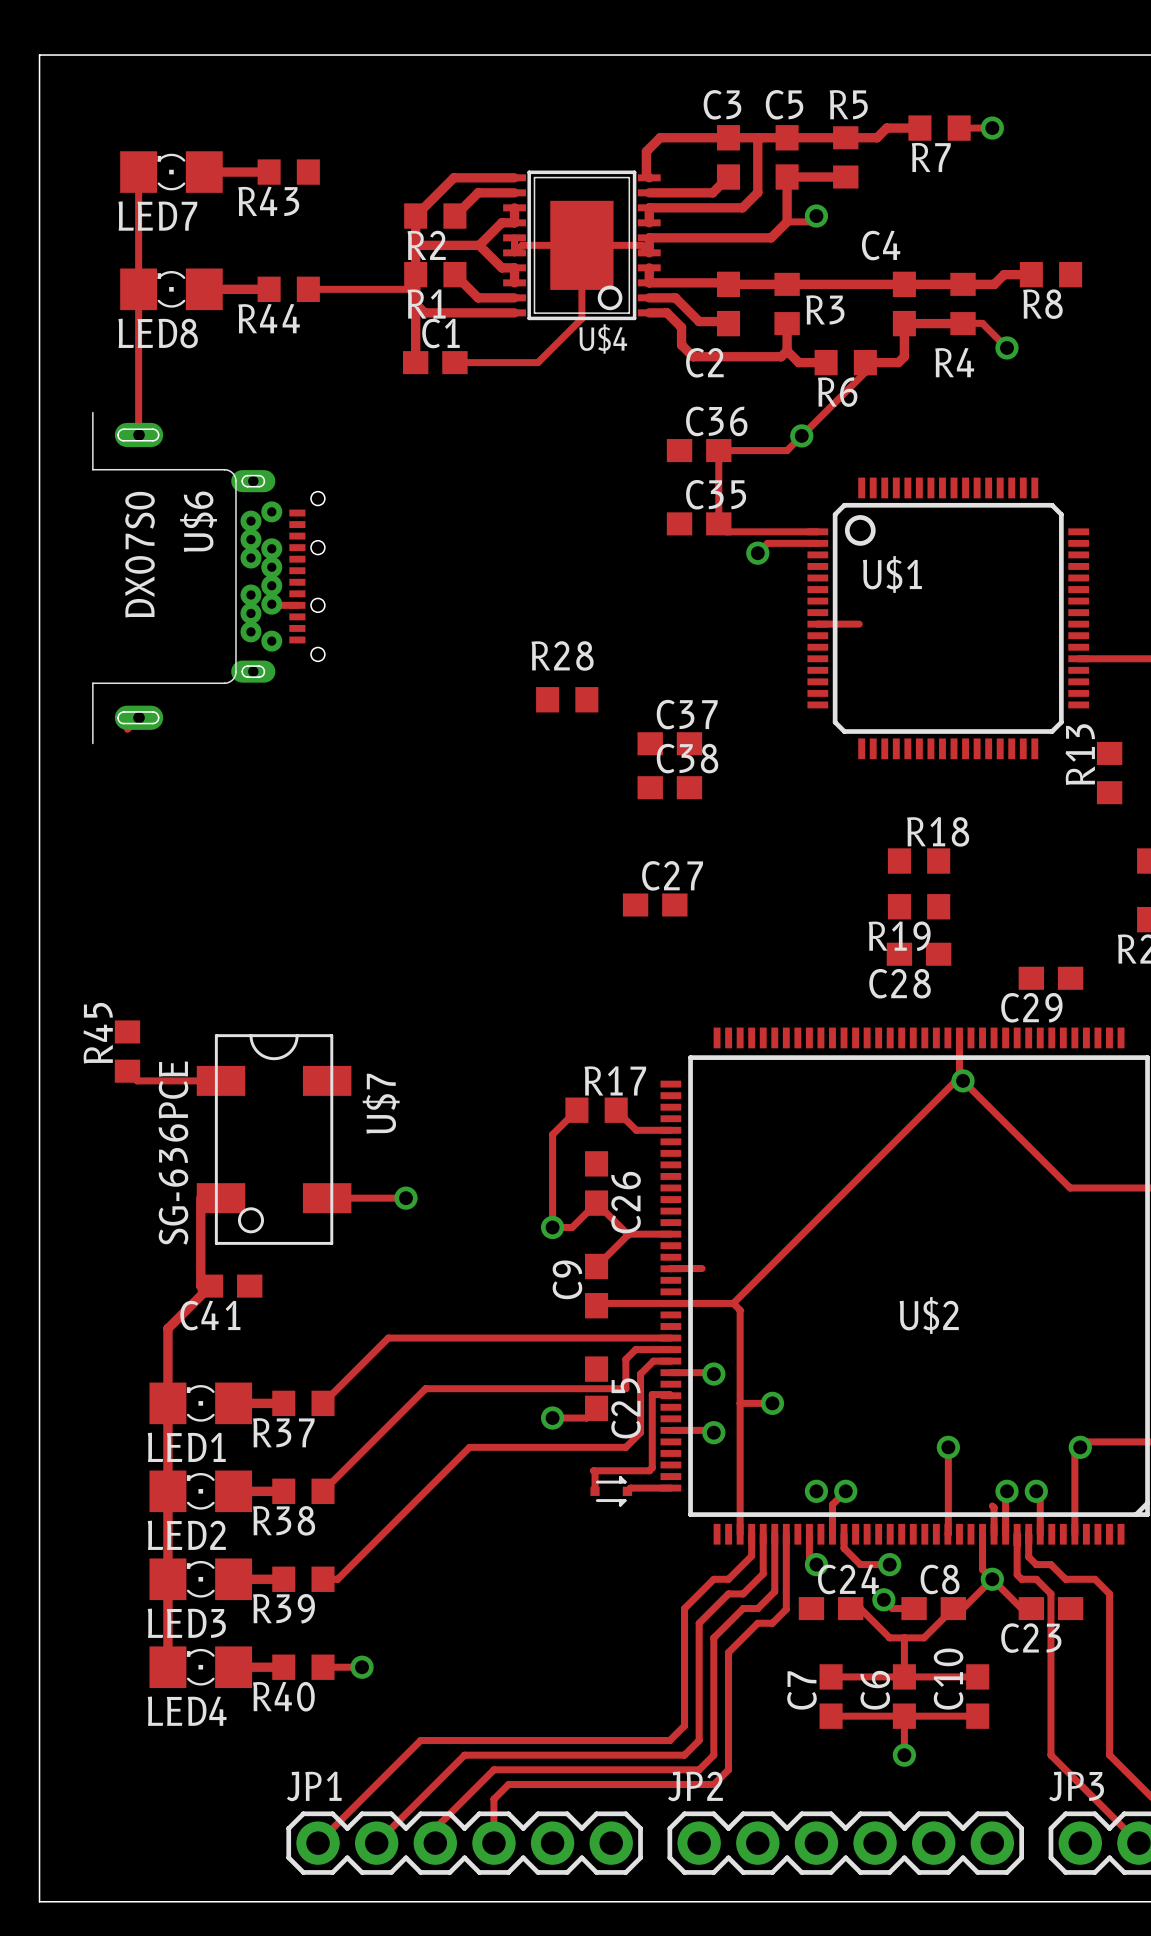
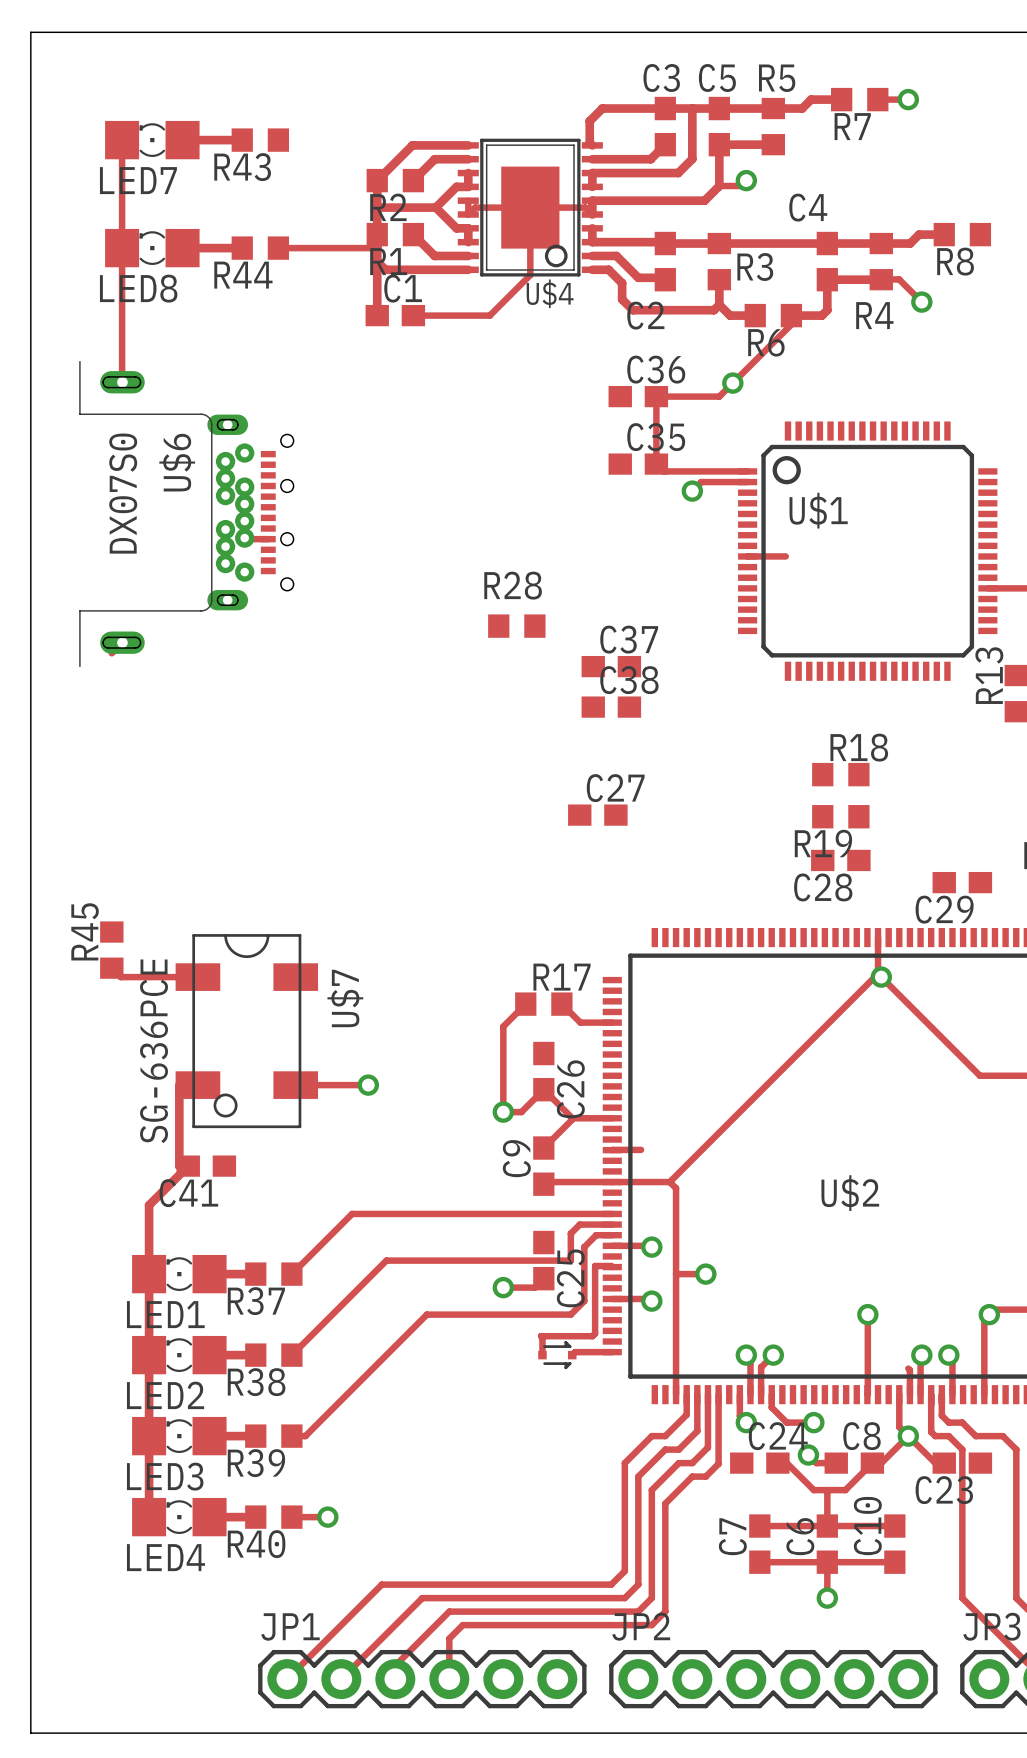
track: none -> (746, 1355) (750, 1359) (750, 1394)

